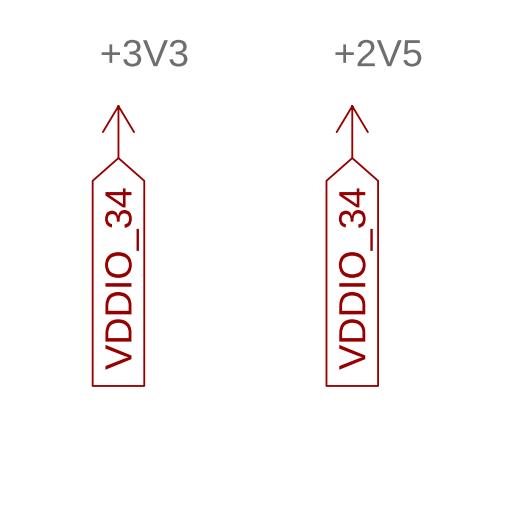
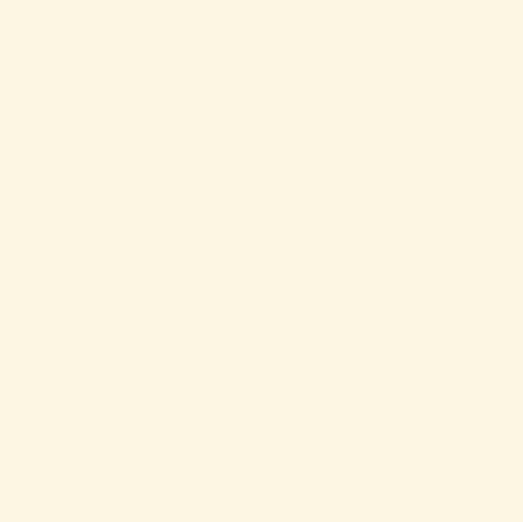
power symbol: +3V3 (118, 132) -> none
power symbol: +2V5 (352, 132) -> none
global label: VDDIO_34 (122, 279) -> none
global label: VDDIO_34 (355, 279) -> none

